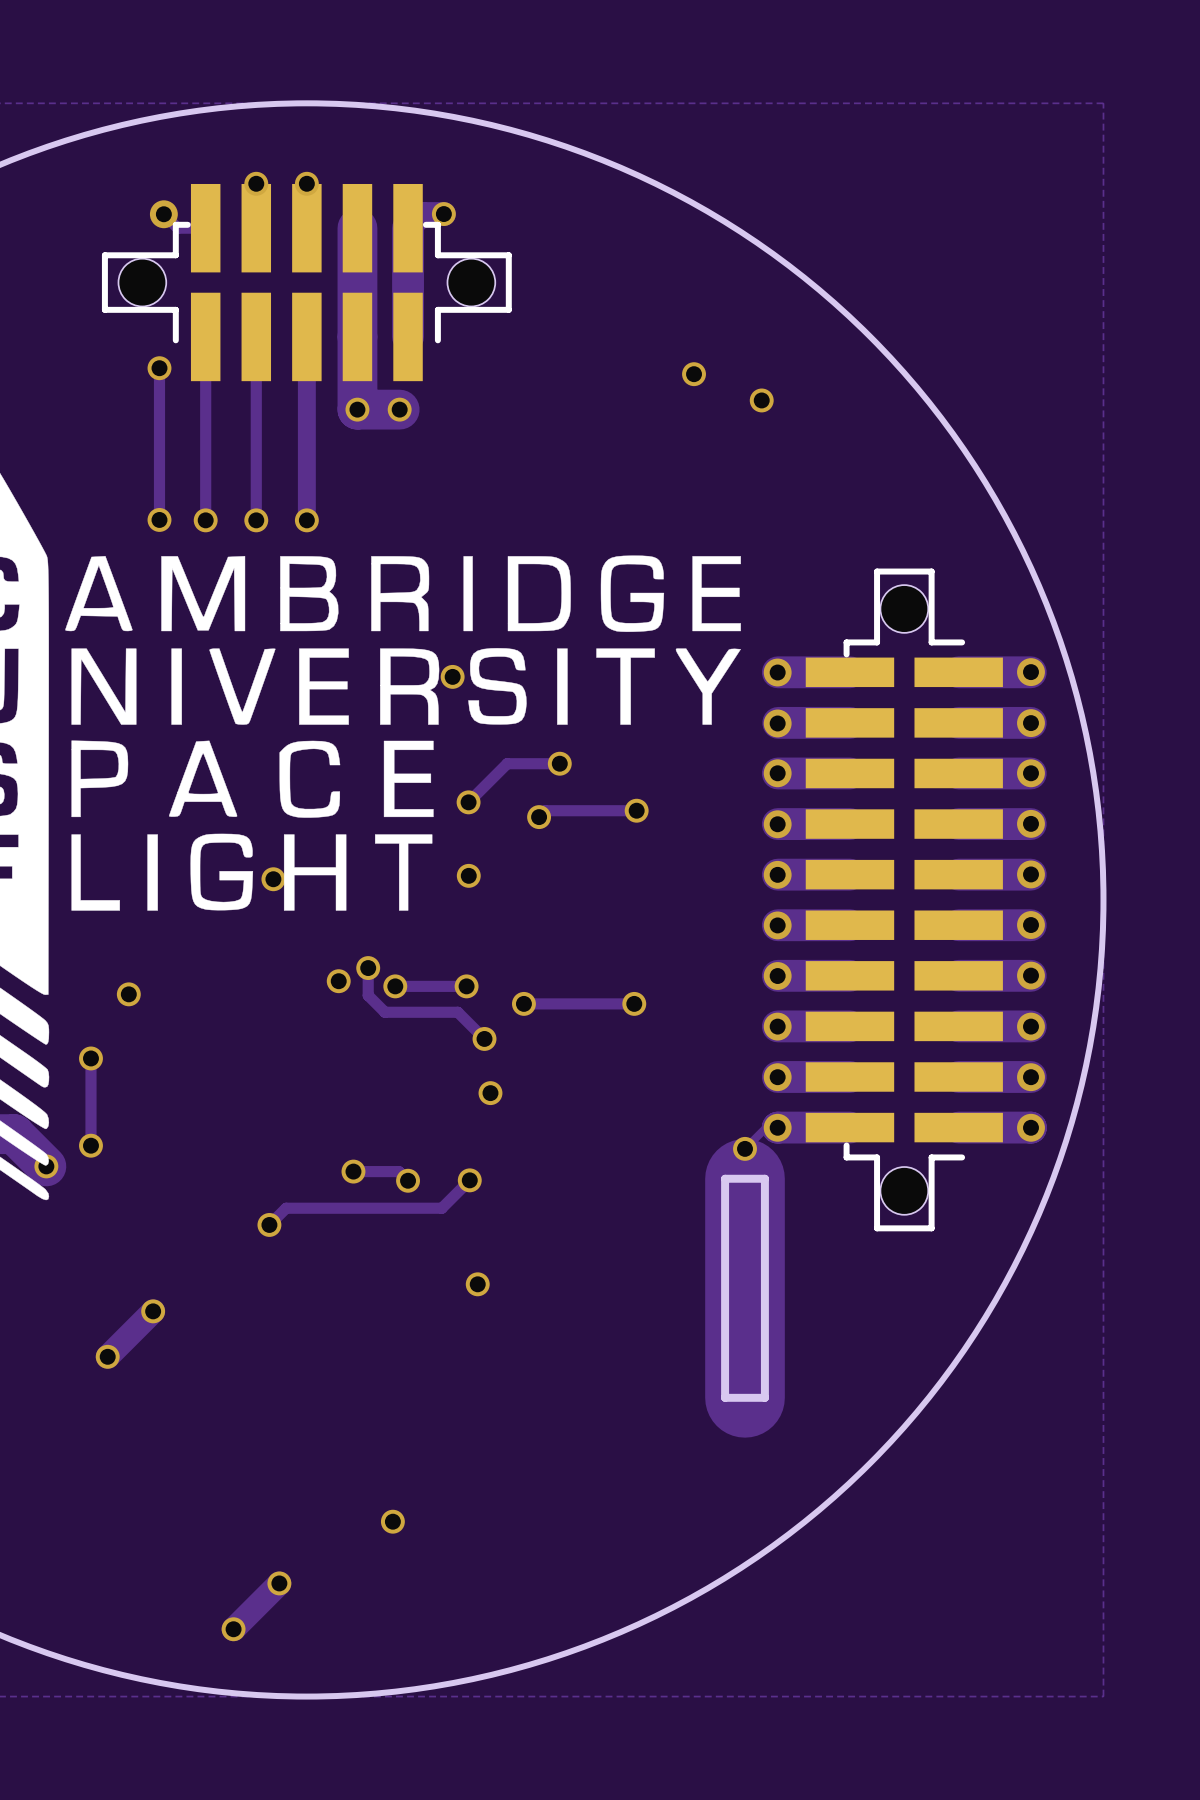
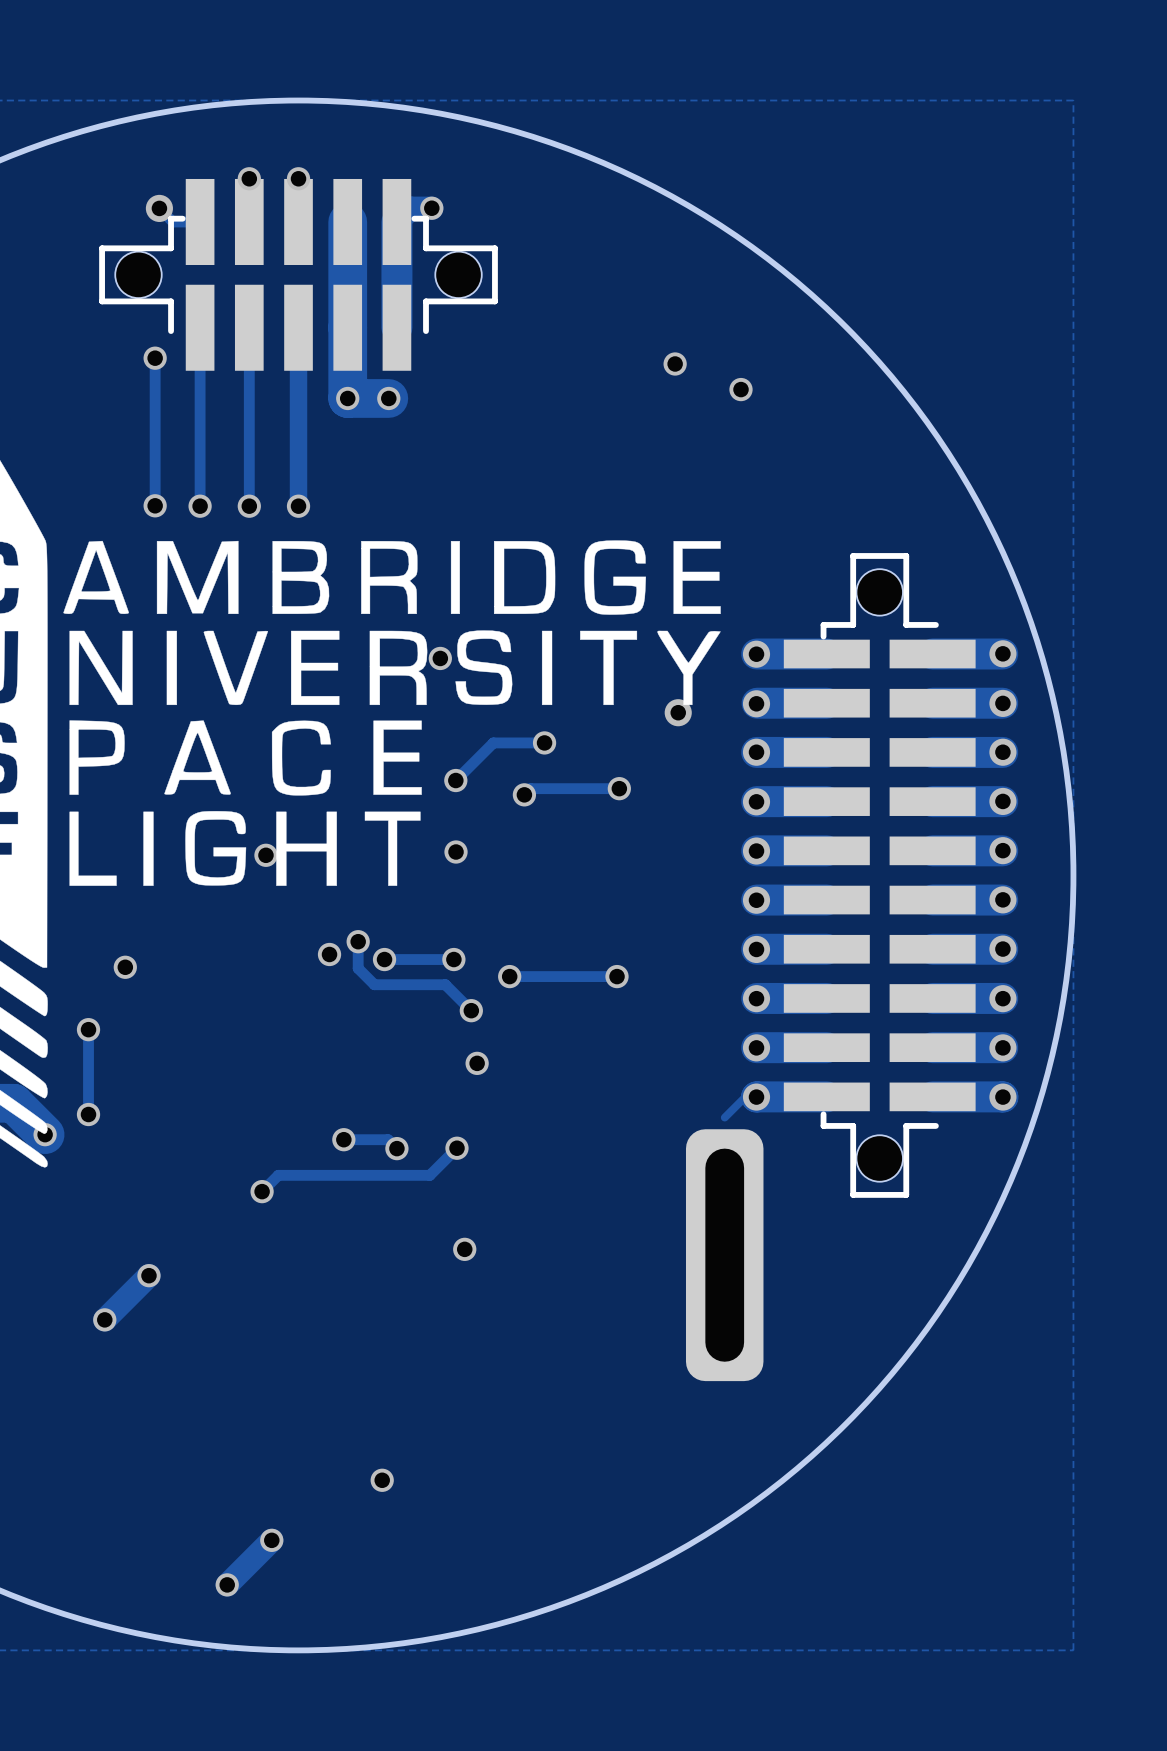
via: none -> (678, 712)
track: (745, 1148) (745, 1397) -> none
via: (745, 1148) -> none
board edge: (764, 1178) (764, 1397) (725, 1397) (725, 1178) (764, 1178) -> none
part: none -> (724, 1255)

